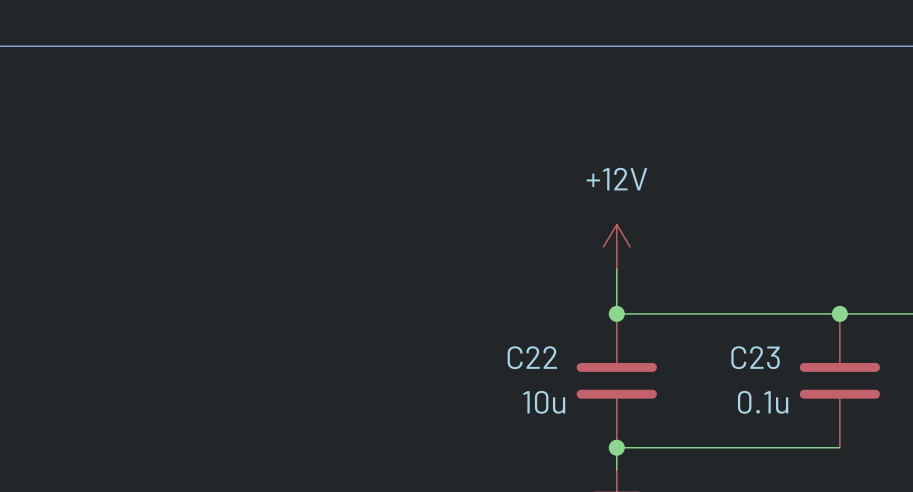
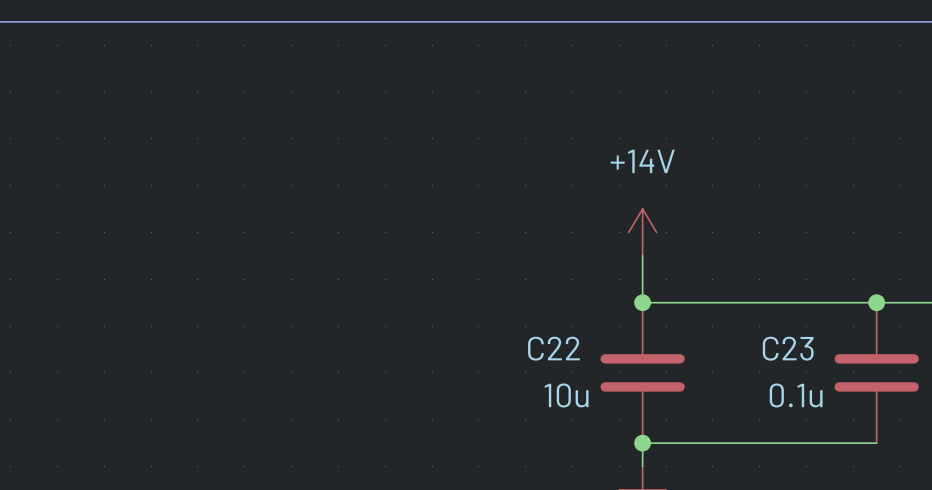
power symbol: +12V (616, 246) -> +14V (642, 232)

